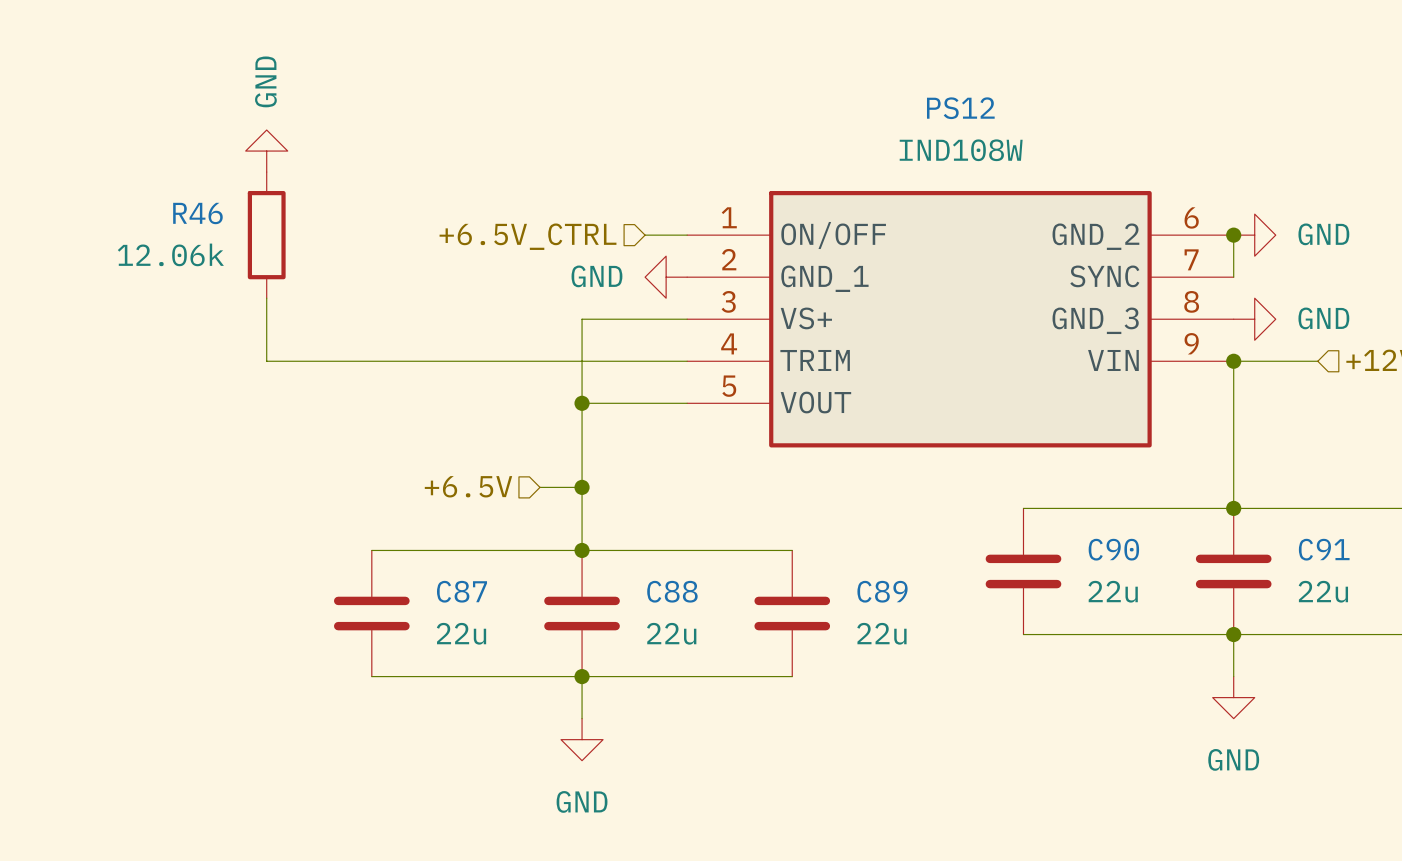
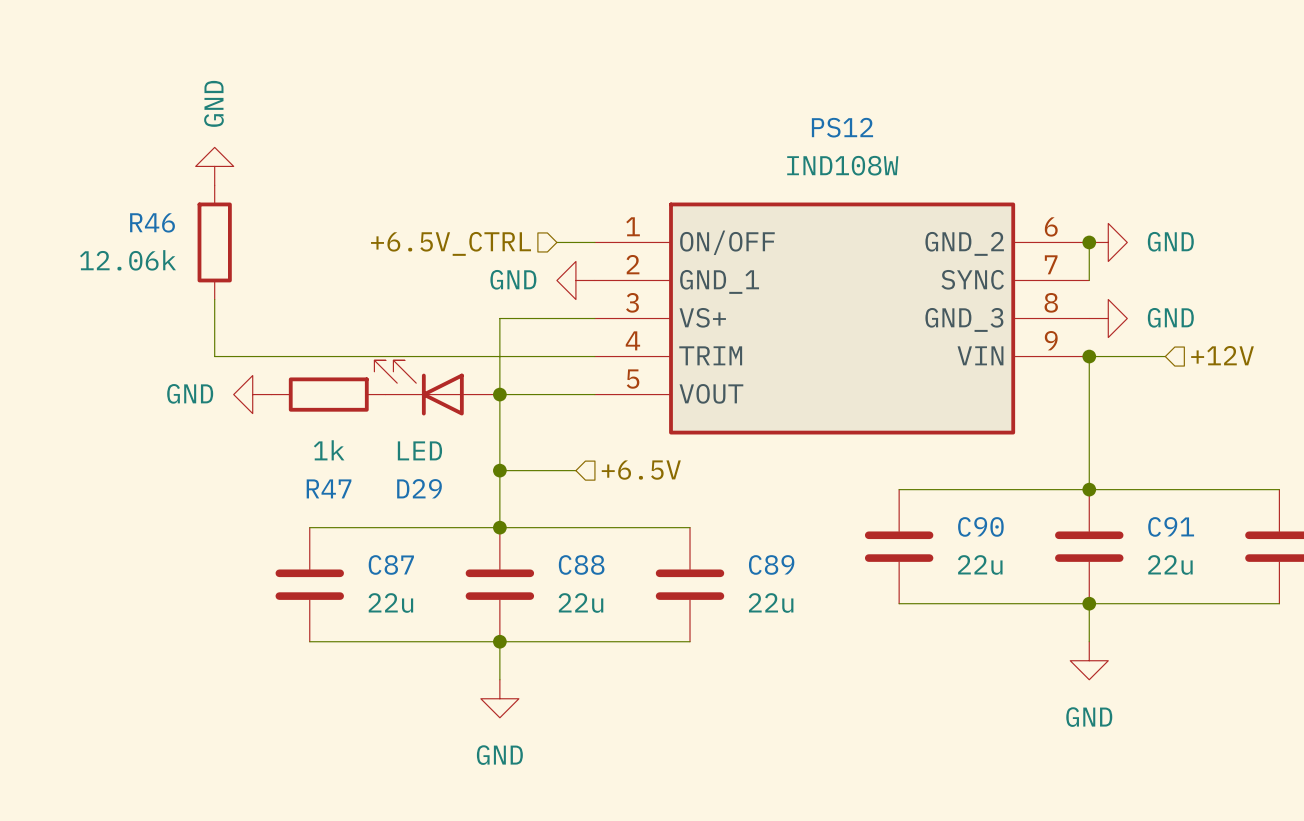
D29: none -> LED (437, 387)
power symbol: none -> GND (252, 394)
R47: none -> 1k (328, 394)
hierarchical label rotation: 0° (468, 486) -> 180° (641, 470)
hierarchical label position: +6.5V (468, 486) -> +6.5V (641, 470)
wire: (539, 487) (582, 487) -> (575, 470) (499, 470)

